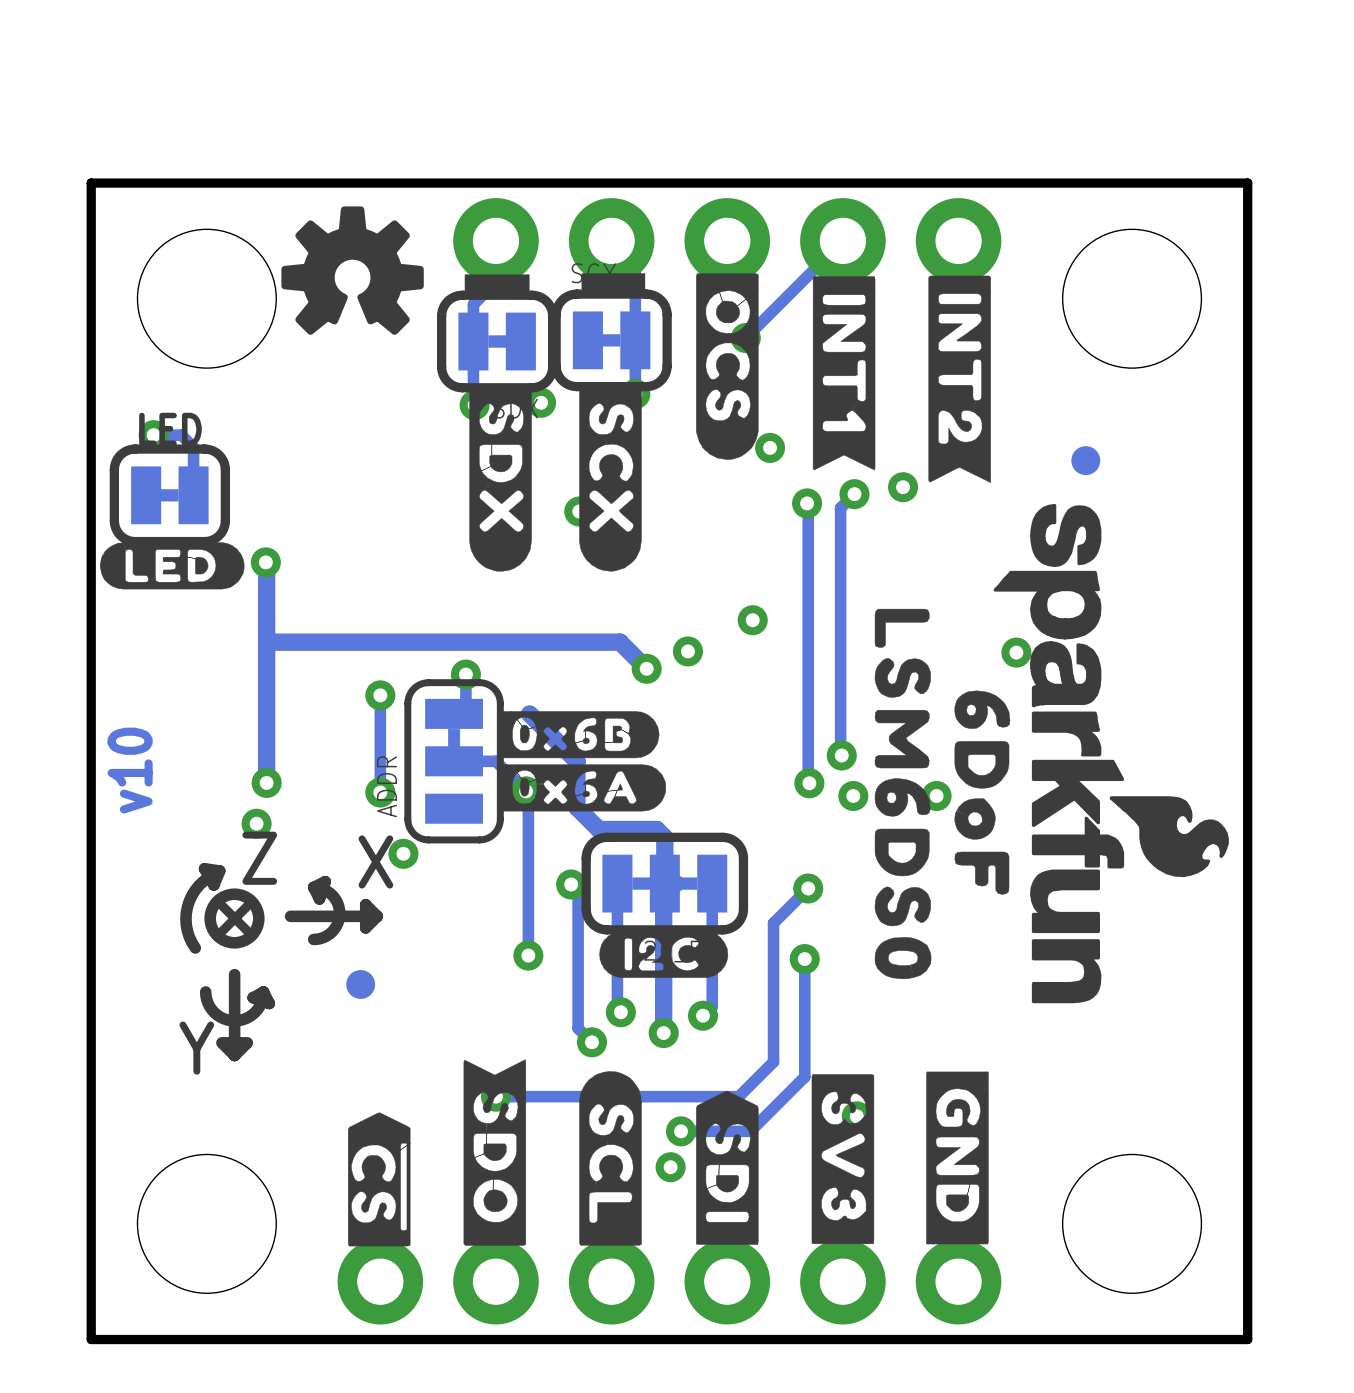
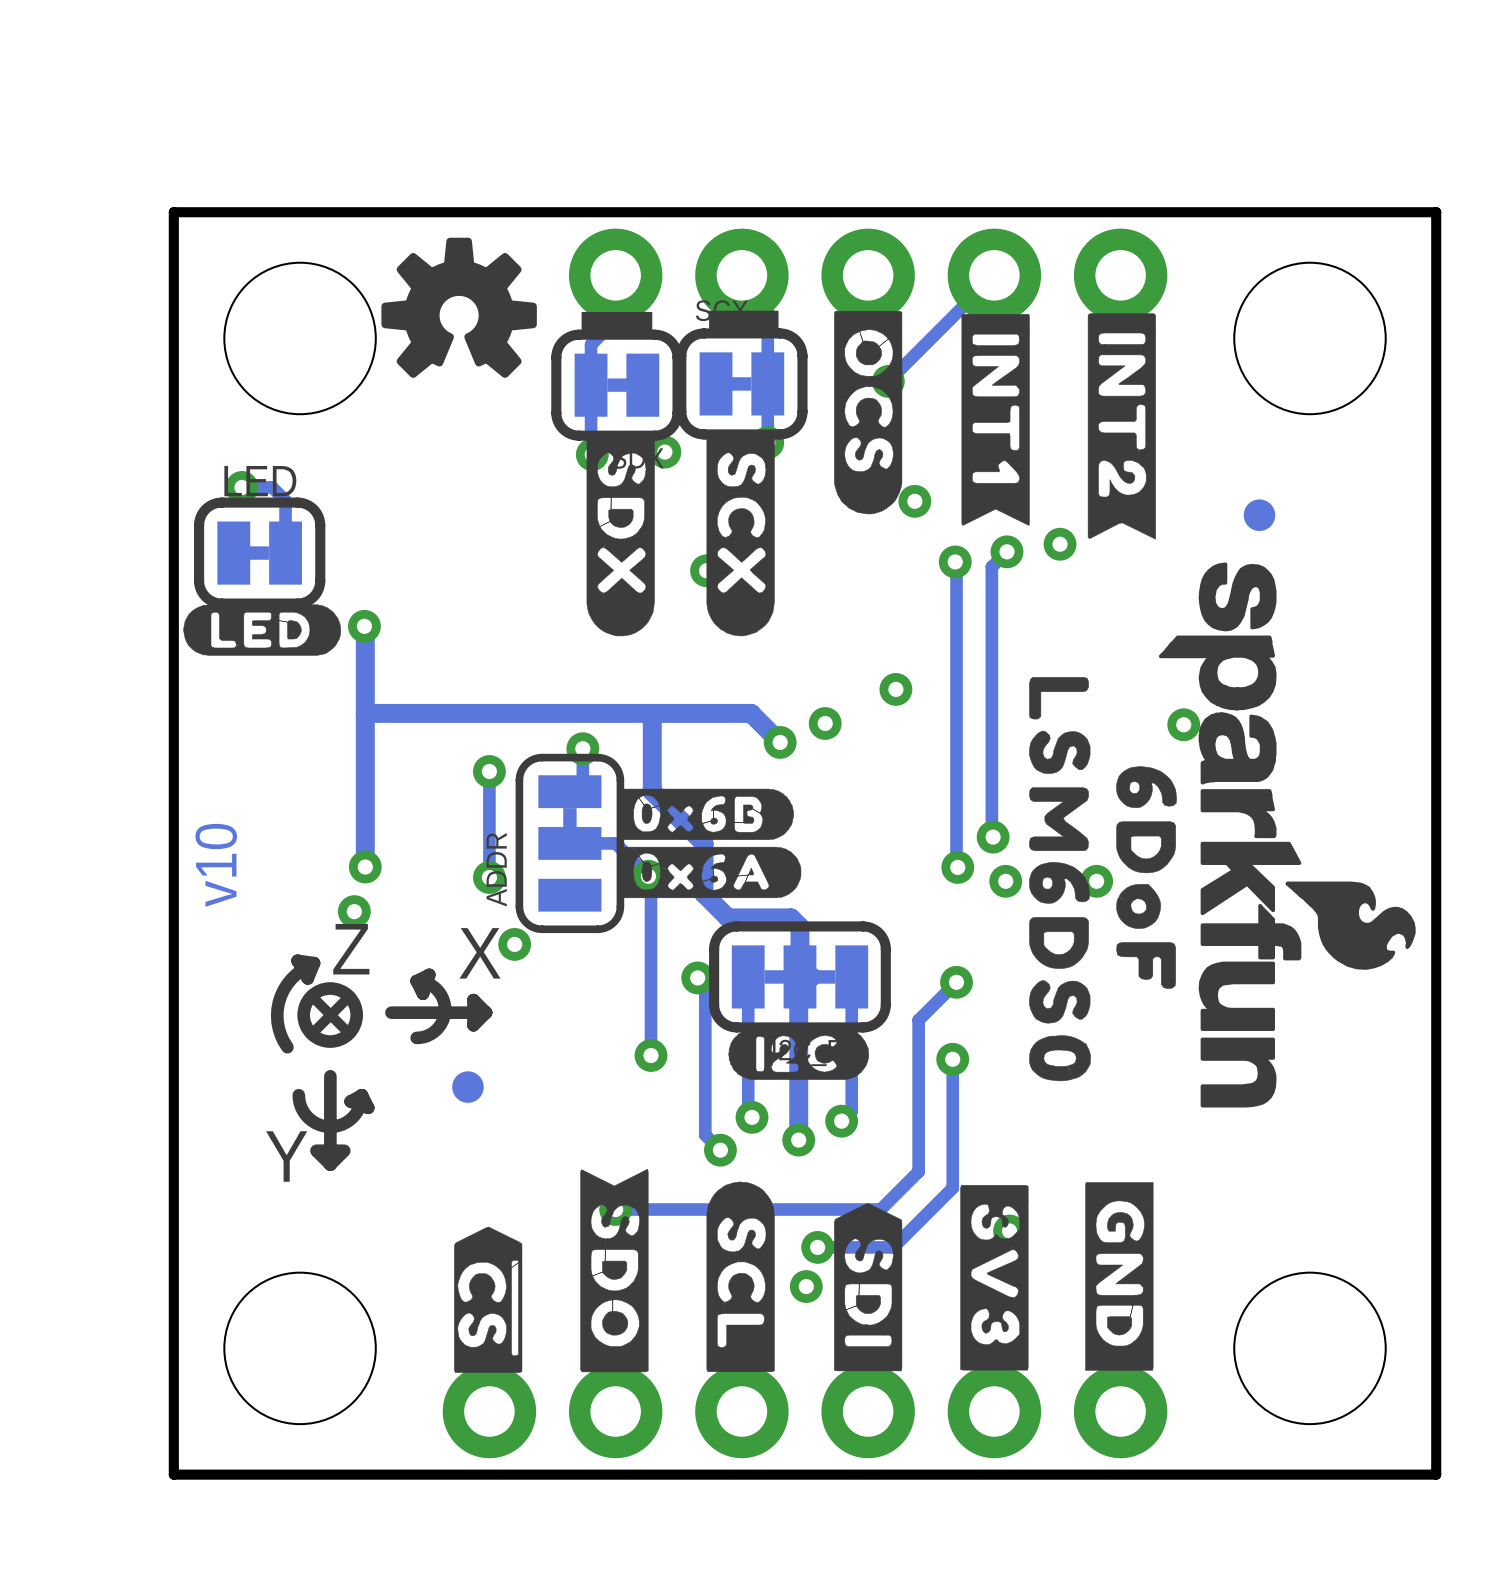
track: none -> (653, 713) (652, 791)

